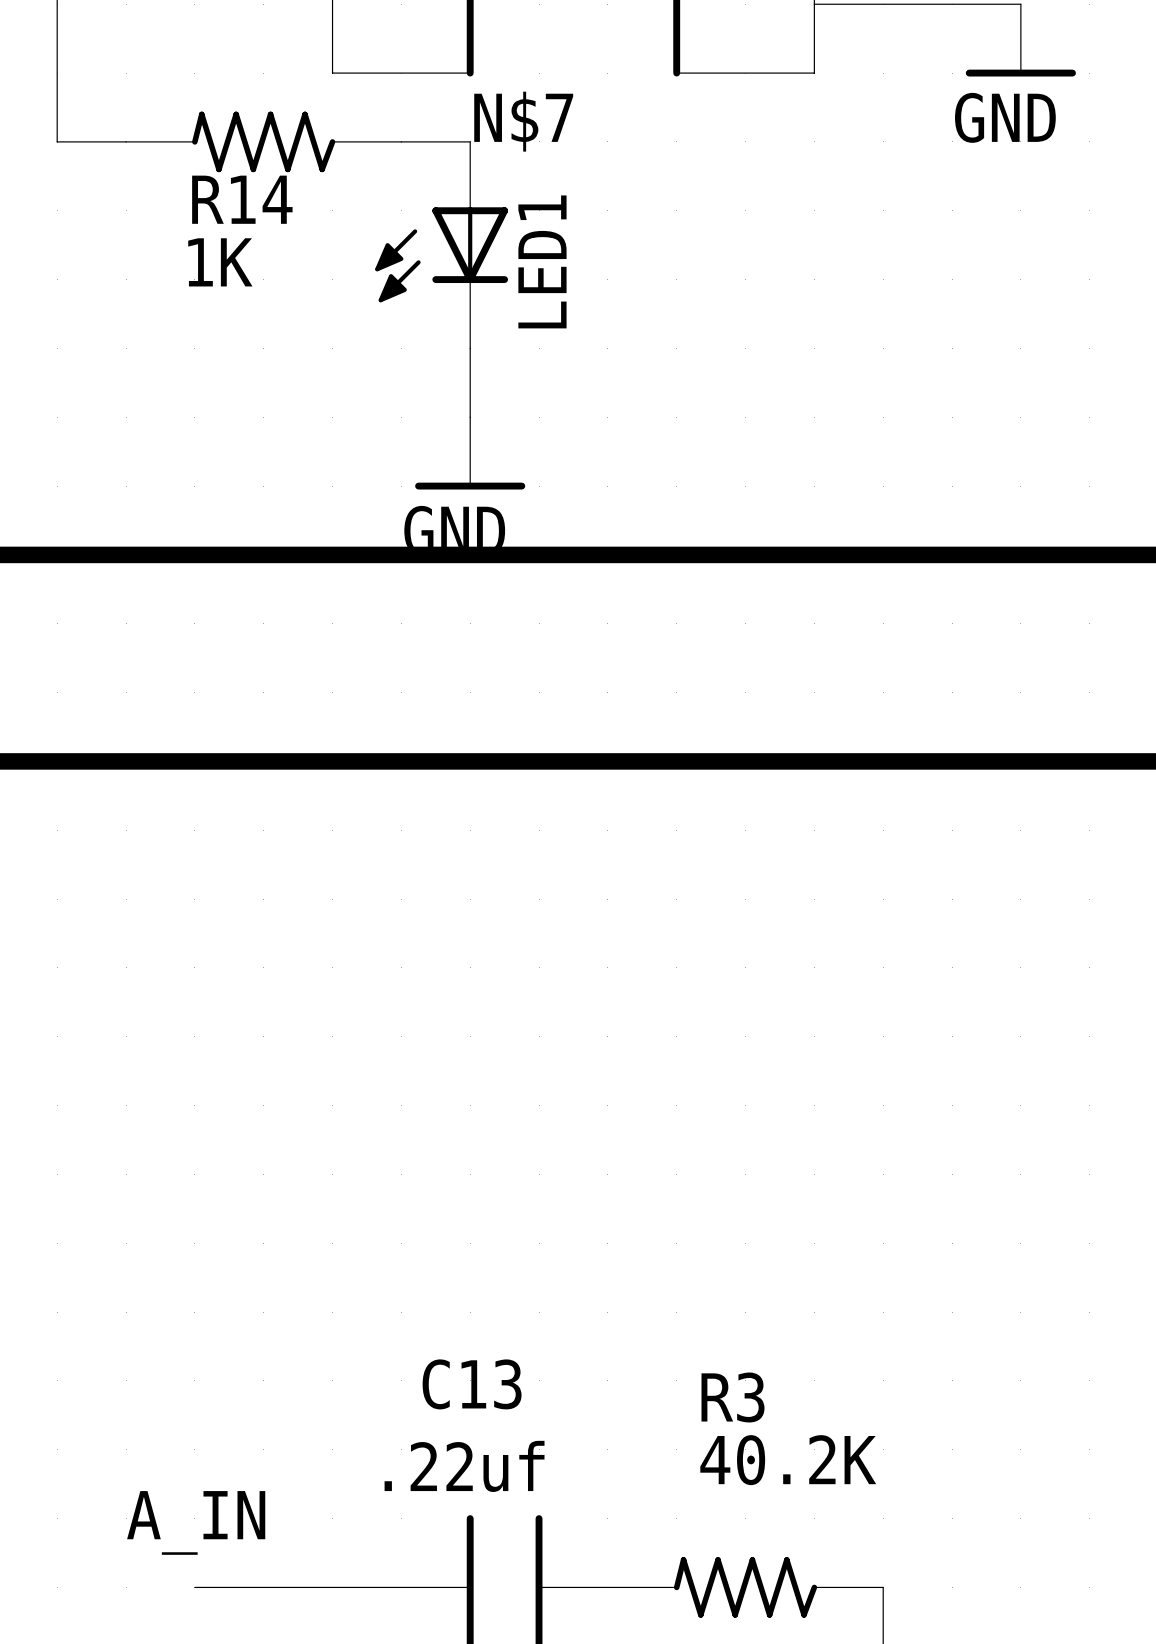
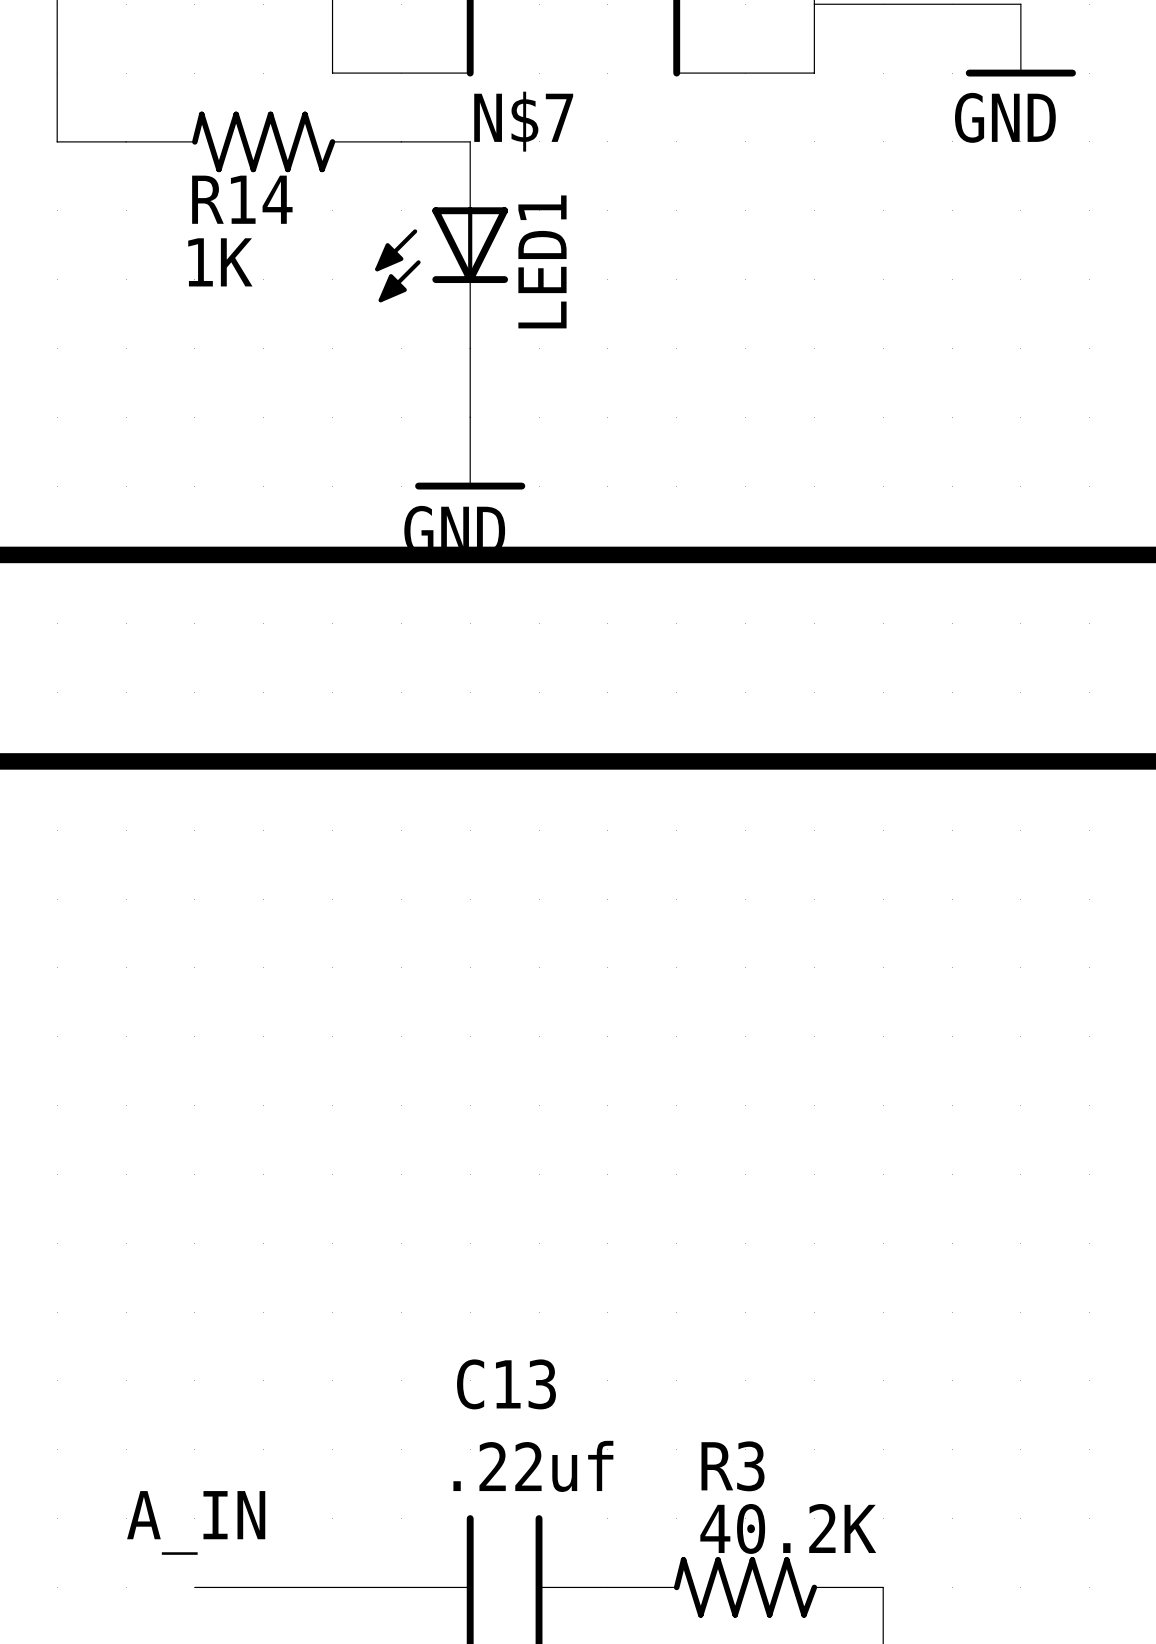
C13 name position: C13 (472, 1384) -> C13 (506, 1384)
R3 name position: R3 (733, 1397) -> R3 (733, 1466)
R3 value position: 40.2K (788, 1460) -> 40.2K (788, 1528)
C13 value position: .22uf (464, 1466) -> .22uf (533, 1466)

